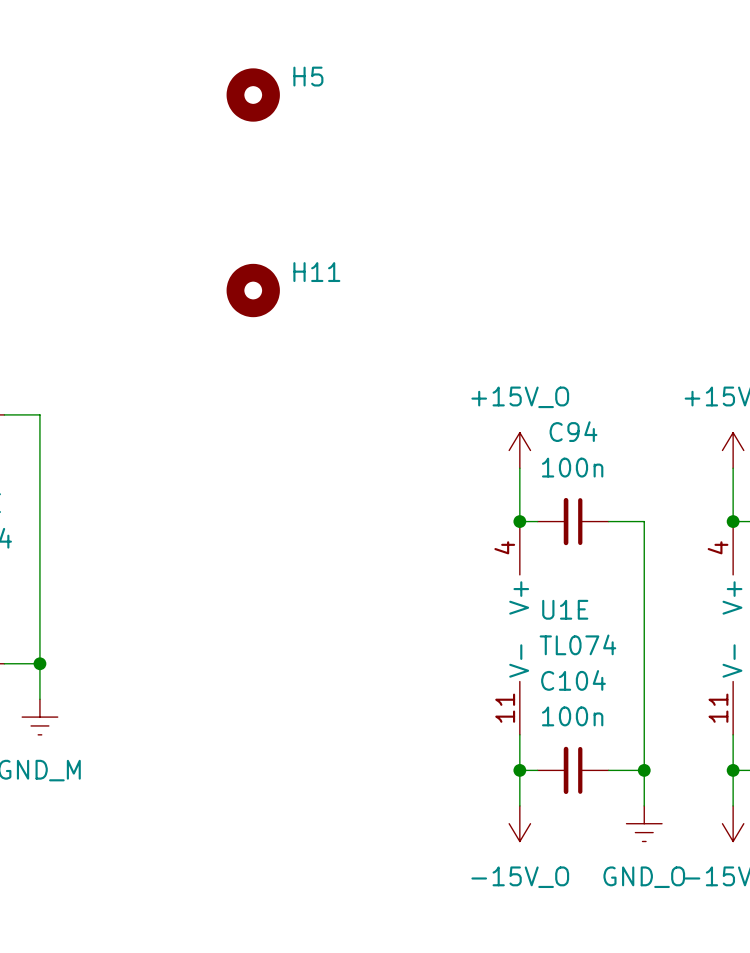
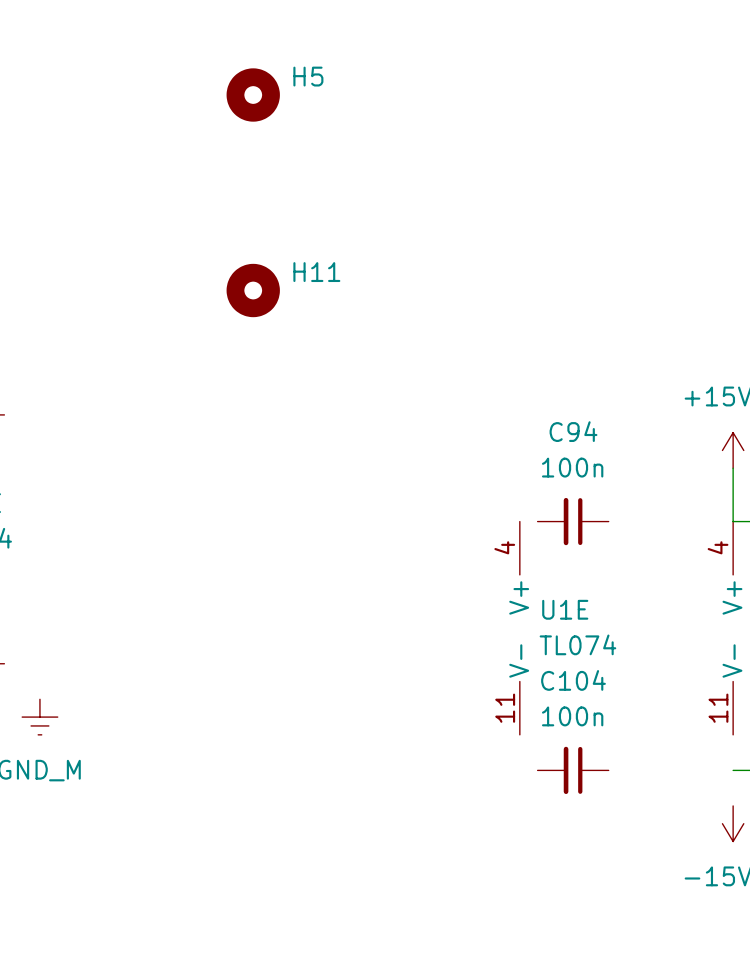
wire: (4, 414) (39, 414) (39, 699) -> none
power symbol: +15V_O (519, 450) -> none
wire: (519, 468) (519, 521) (537, 521) -> none
junction: (519, 521) -> none
wire: (608, 521) (644, 521) (644, 805) -> none
junction: (733, 521) -> none
wire: (4, 663) (39, 663) -> none
junction: (39, 663) -> none
wire: (519, 734) (519, 805) -> none
wire: (733, 734) (733, 805) -> none
wire: (519, 770) (537, 770) -> none
junction: (519, 770) -> none
wire: (608, 770) (644, 770) -> none
junction: (644, 770) -> none
junction: (733, 770) -> none
power symbol: -15V_O (519, 823) -> none
power symbol: GND_O (644, 823) -> none

